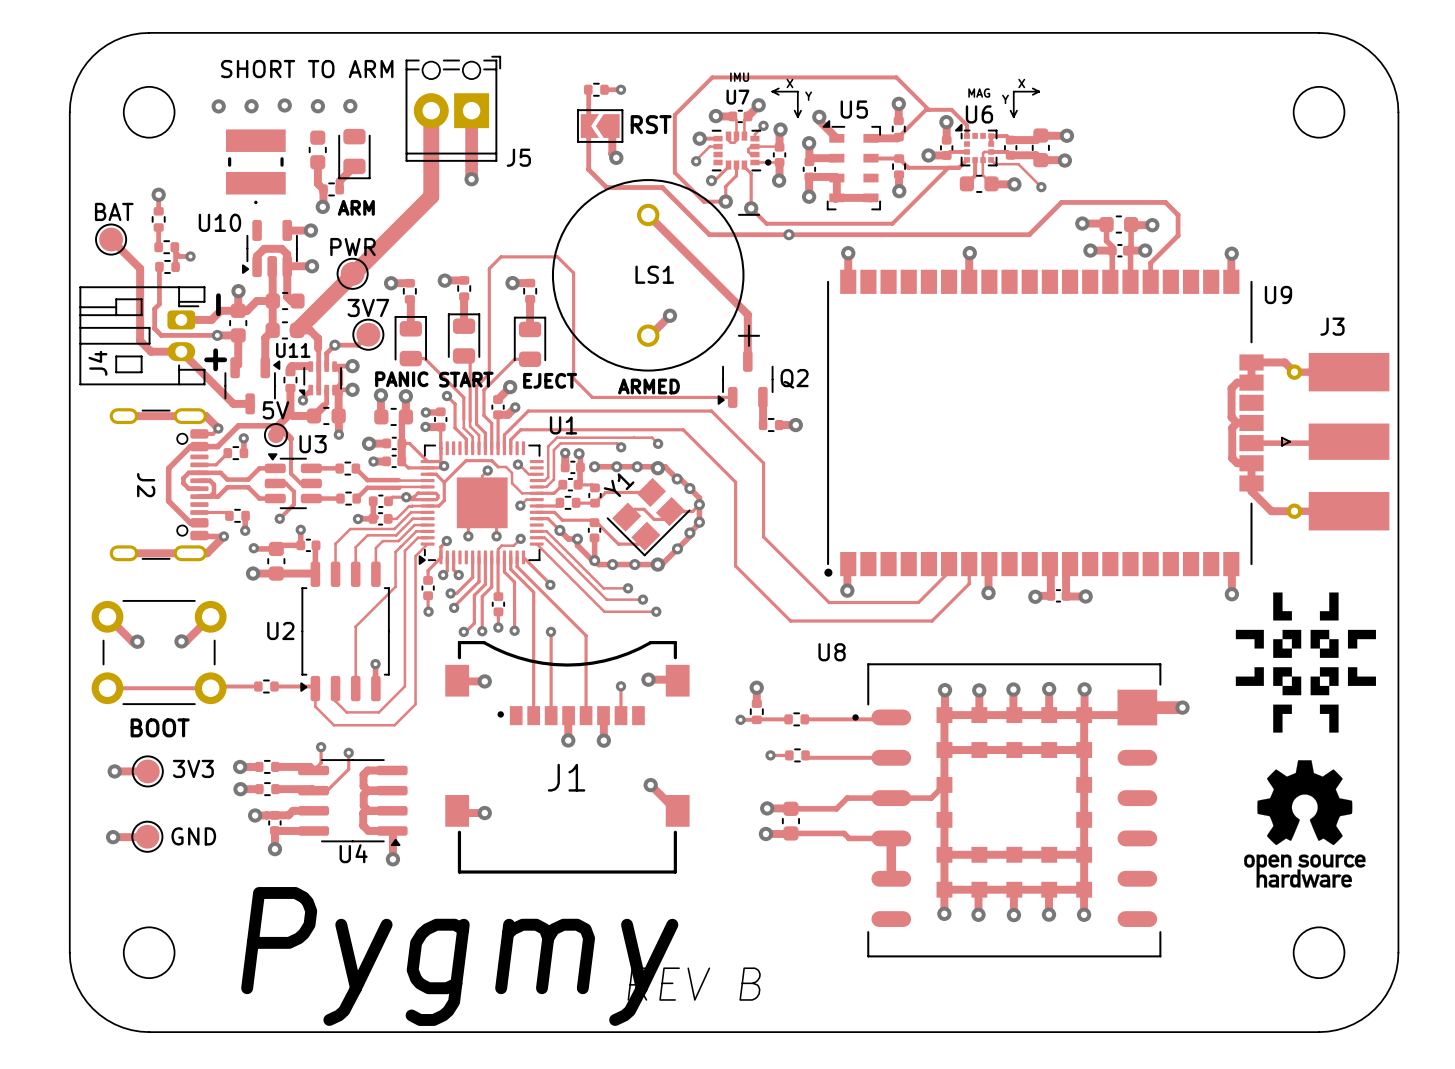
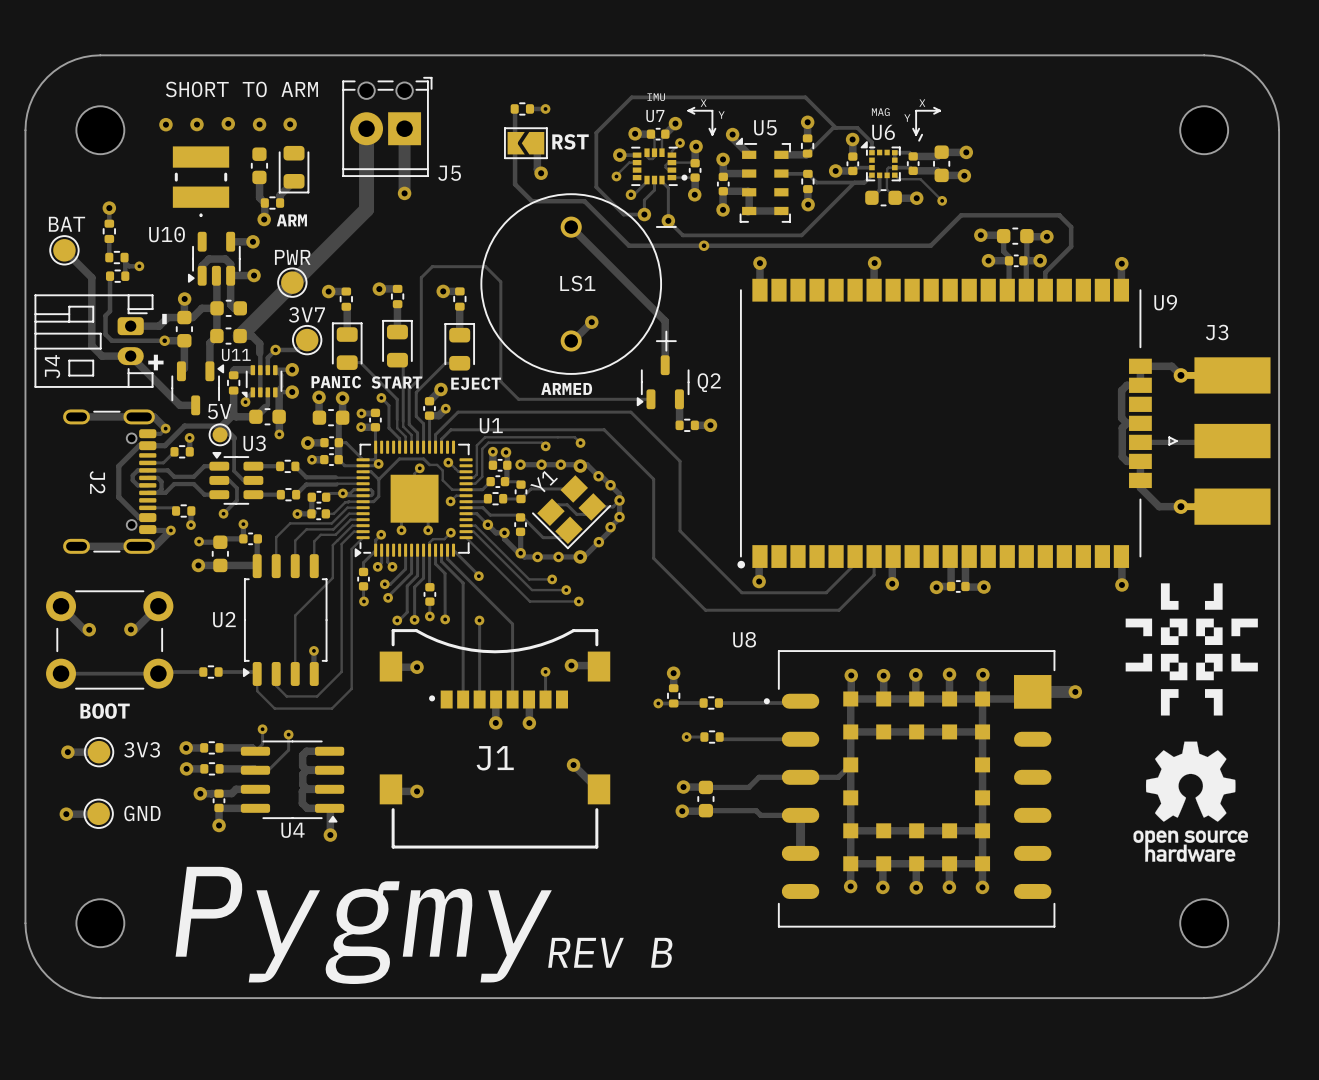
line: none -> (922, 134) (919, 140)

